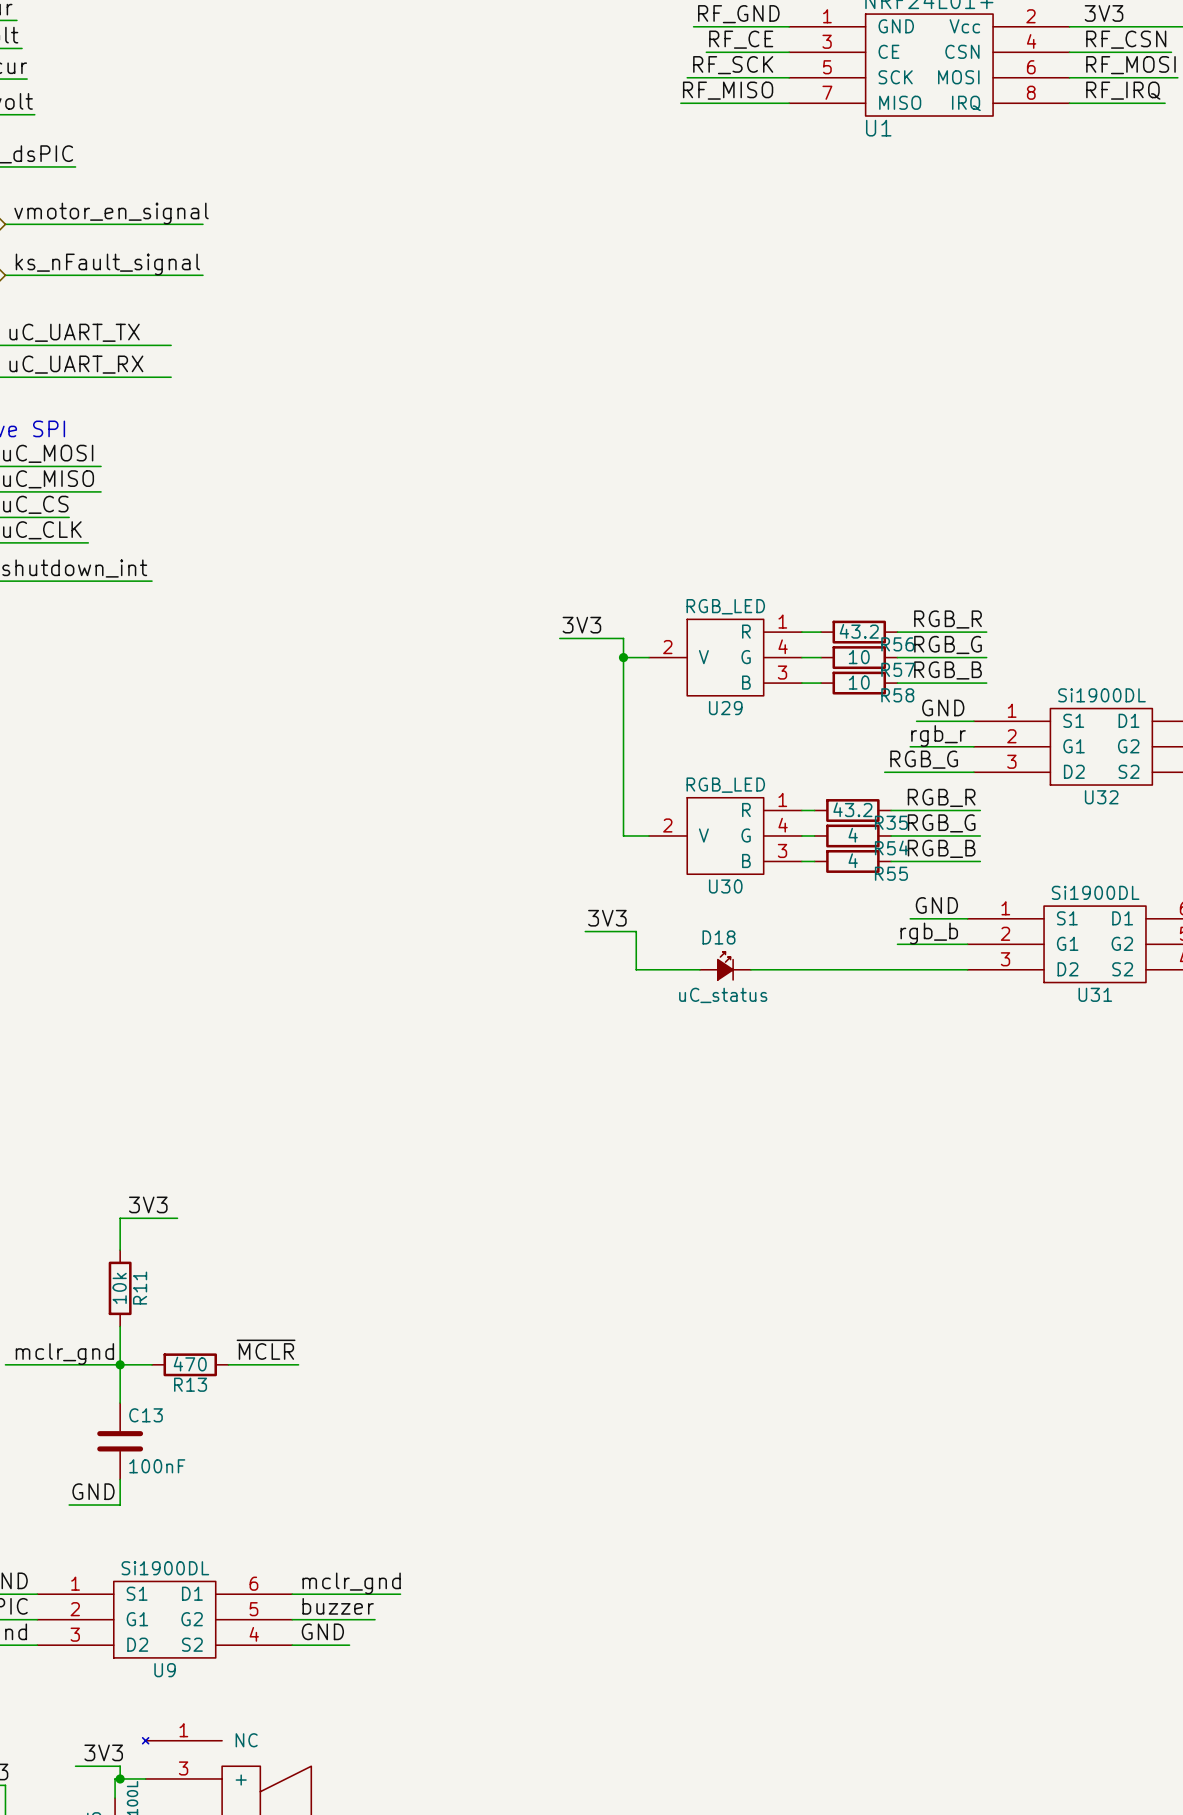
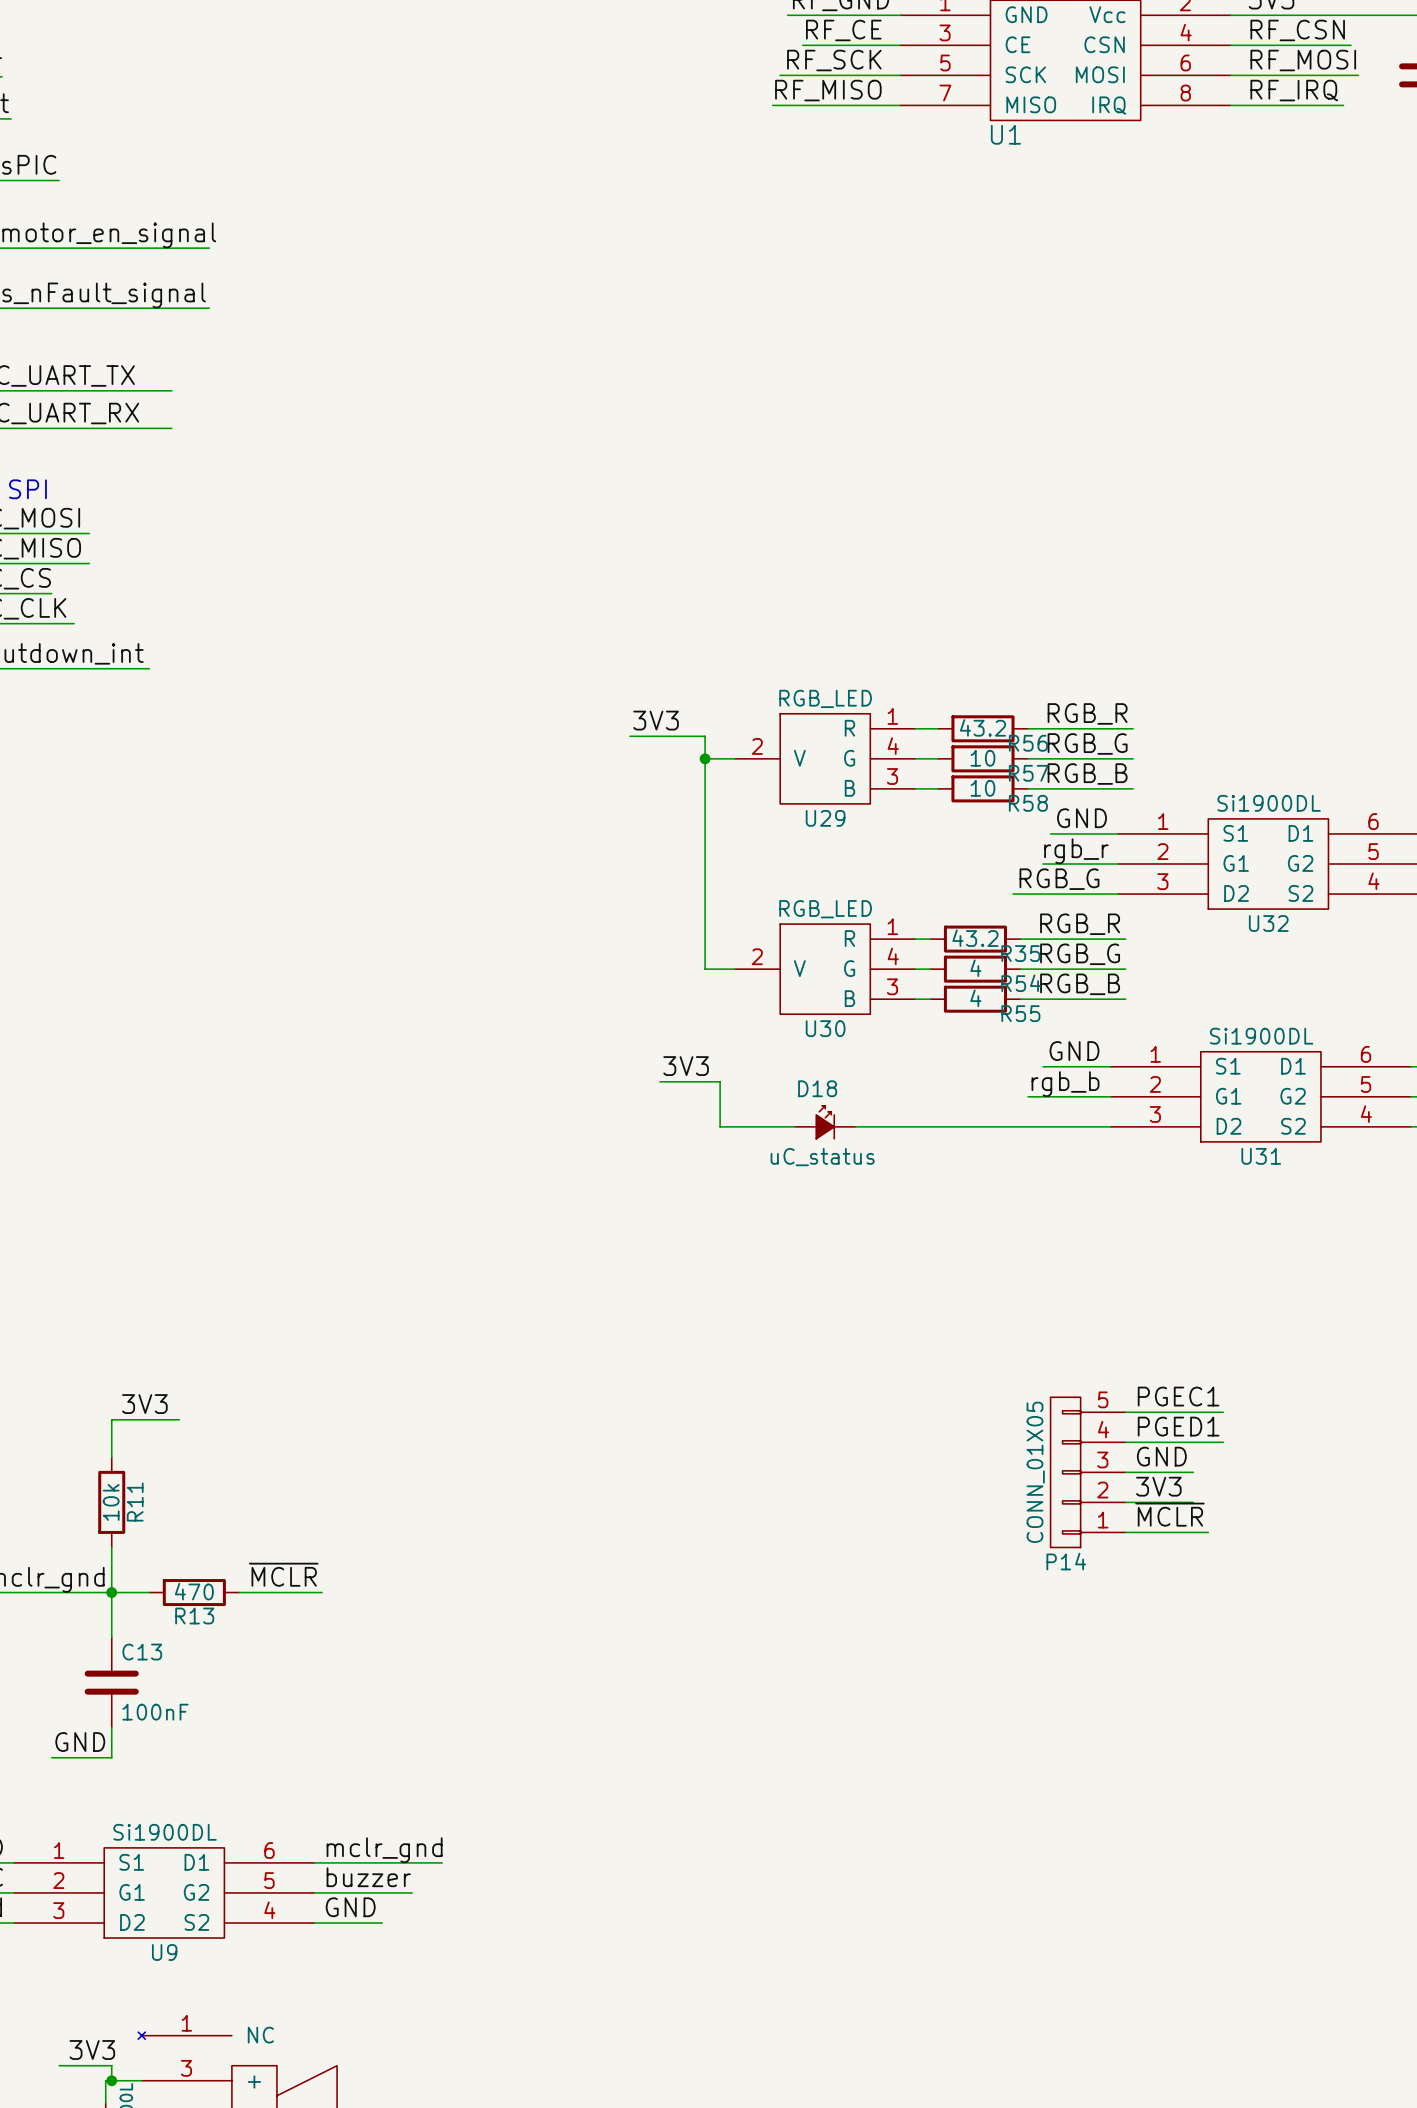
label: none -> PGEC1 (1178, 1396)
wire: none -> (1125, 1412) (1223, 1412)
label: none -> PGED1 (1178, 1426)
wire: none -> (1125, 1442) (1223, 1442)
label: none -> GND (1161, 1456)
P14: none -> CONN_01X05 (1088, 1472)
wire: none -> (1125, 1472) (1193, 1472)
label: none -> 3V3 (1158, 1486)
wire: none -> (1125, 1502) (1193, 1502)
label: none -> ~{MCLR} (1170, 1514)
wire: none -> (1125, 1532) (1208, 1532)

